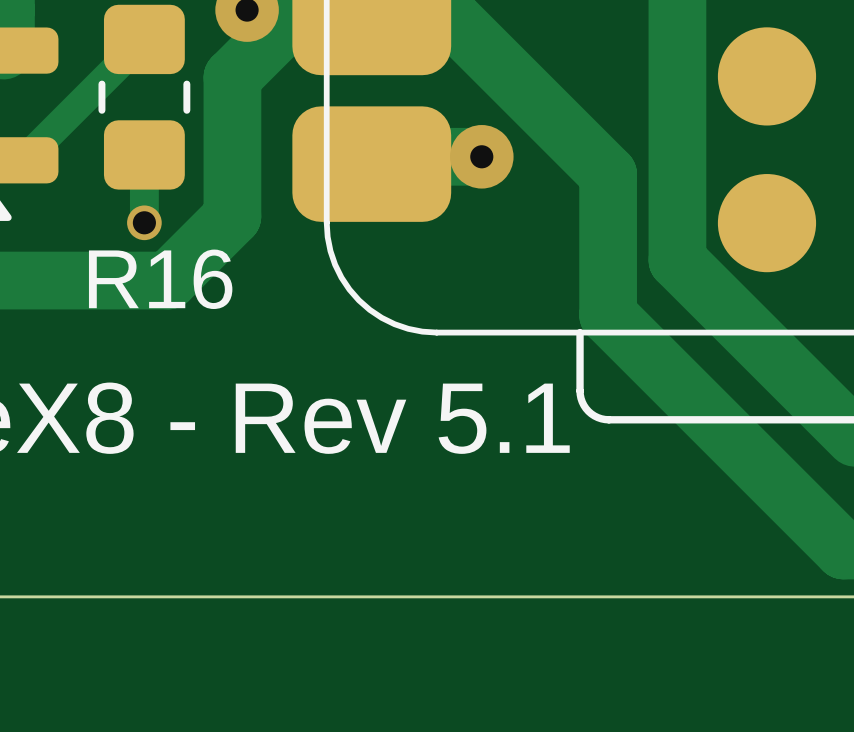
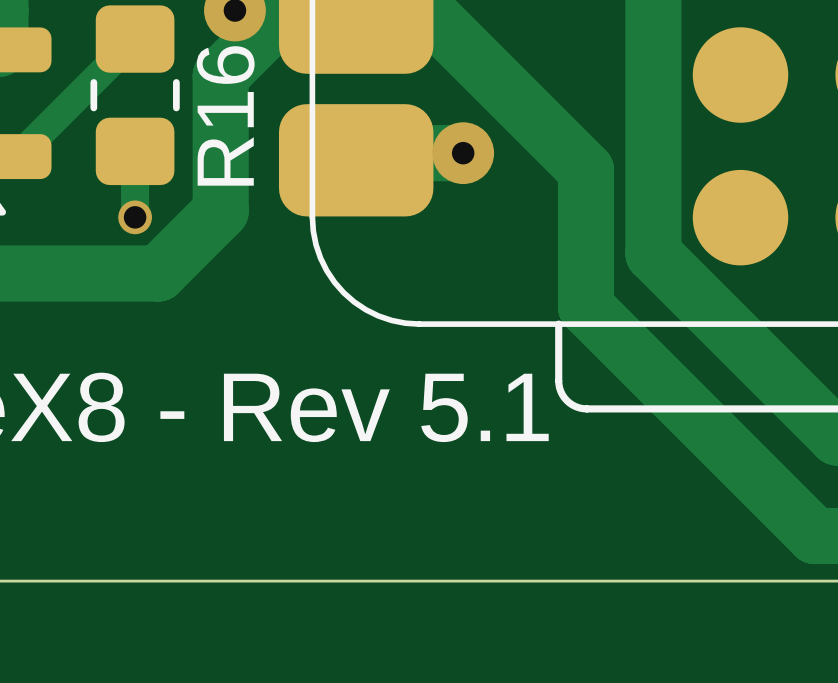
R16 name rotation: 0° (160, 279) -> 90° counterclockwise (225, 115)

